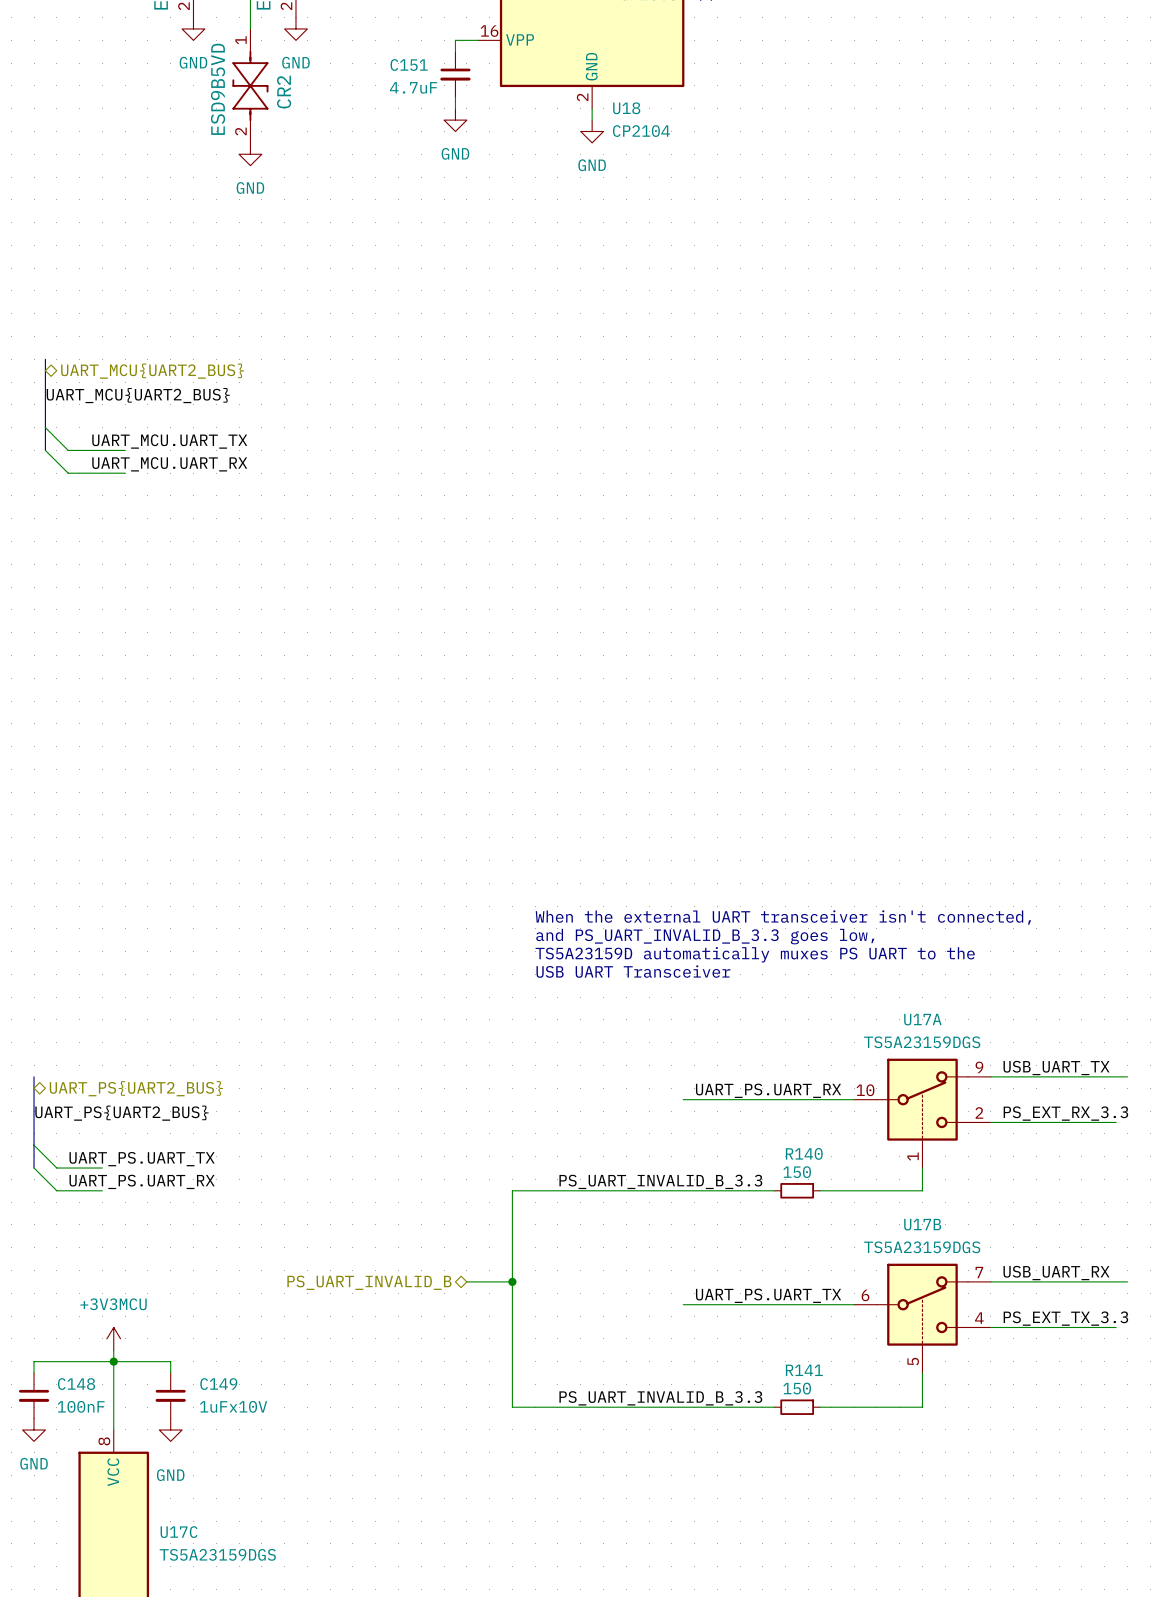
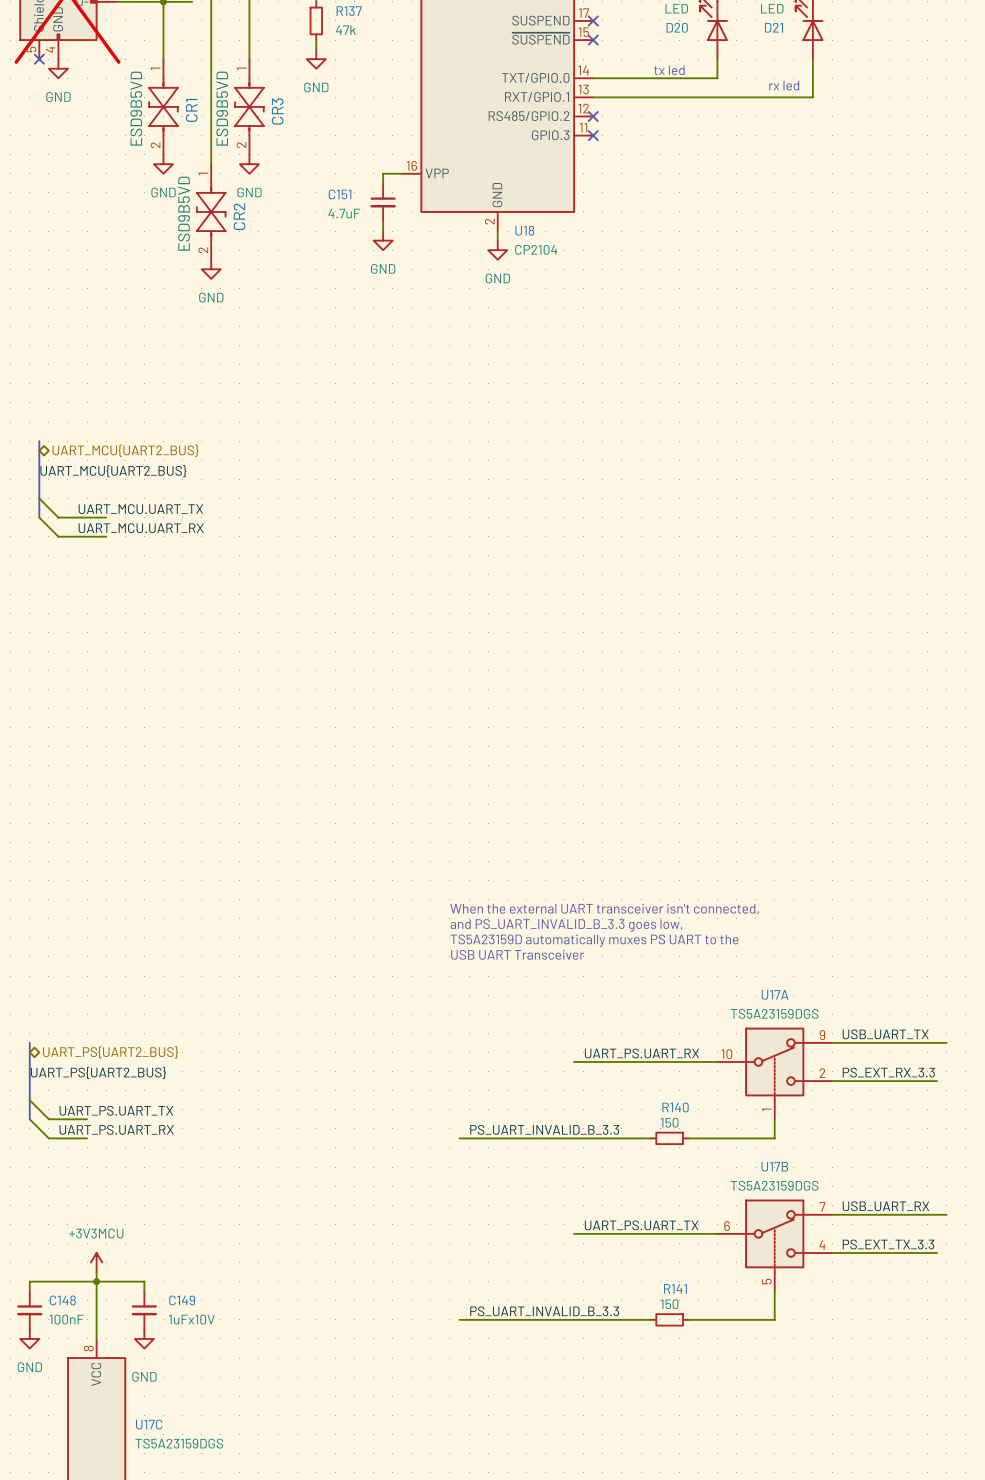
wire: (546, 1190) (512, 1190) (512, 1407) (546, 1407) -> none
wire: (466, 1281) (512, 1281) -> none
junction: (512, 1281) -> none
hierarchical label: PS_UART_INVALID_B (369, 1282) -> none

